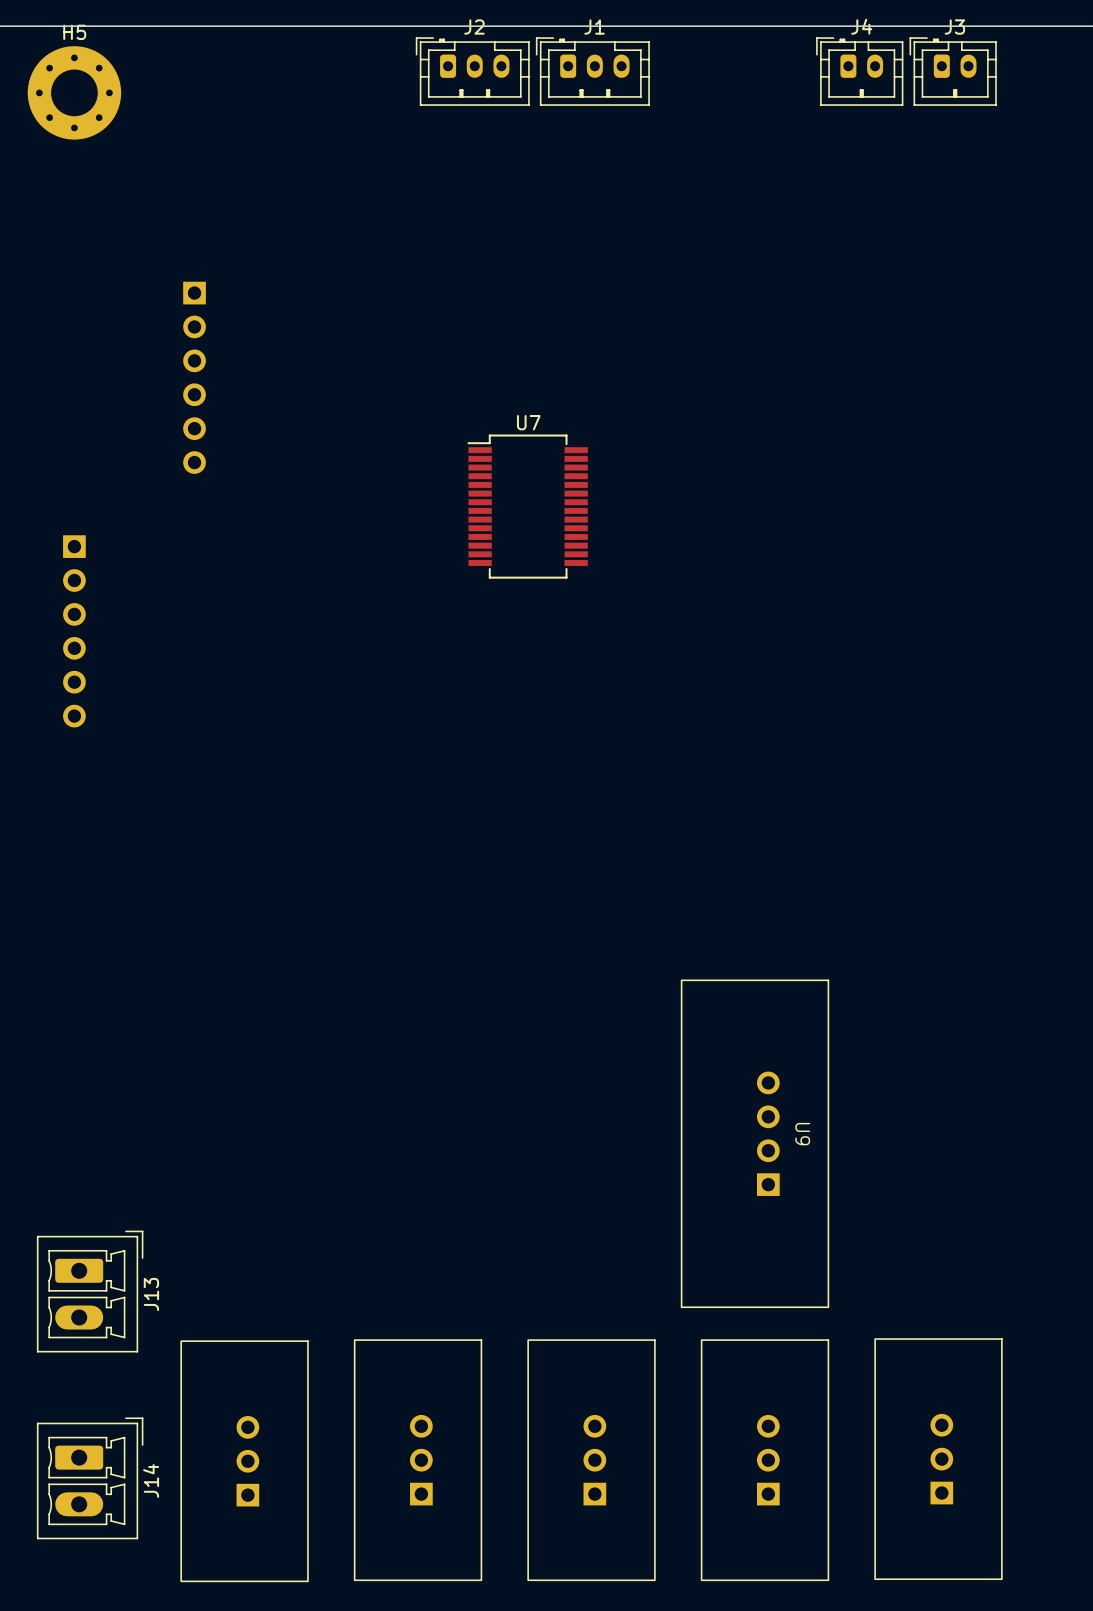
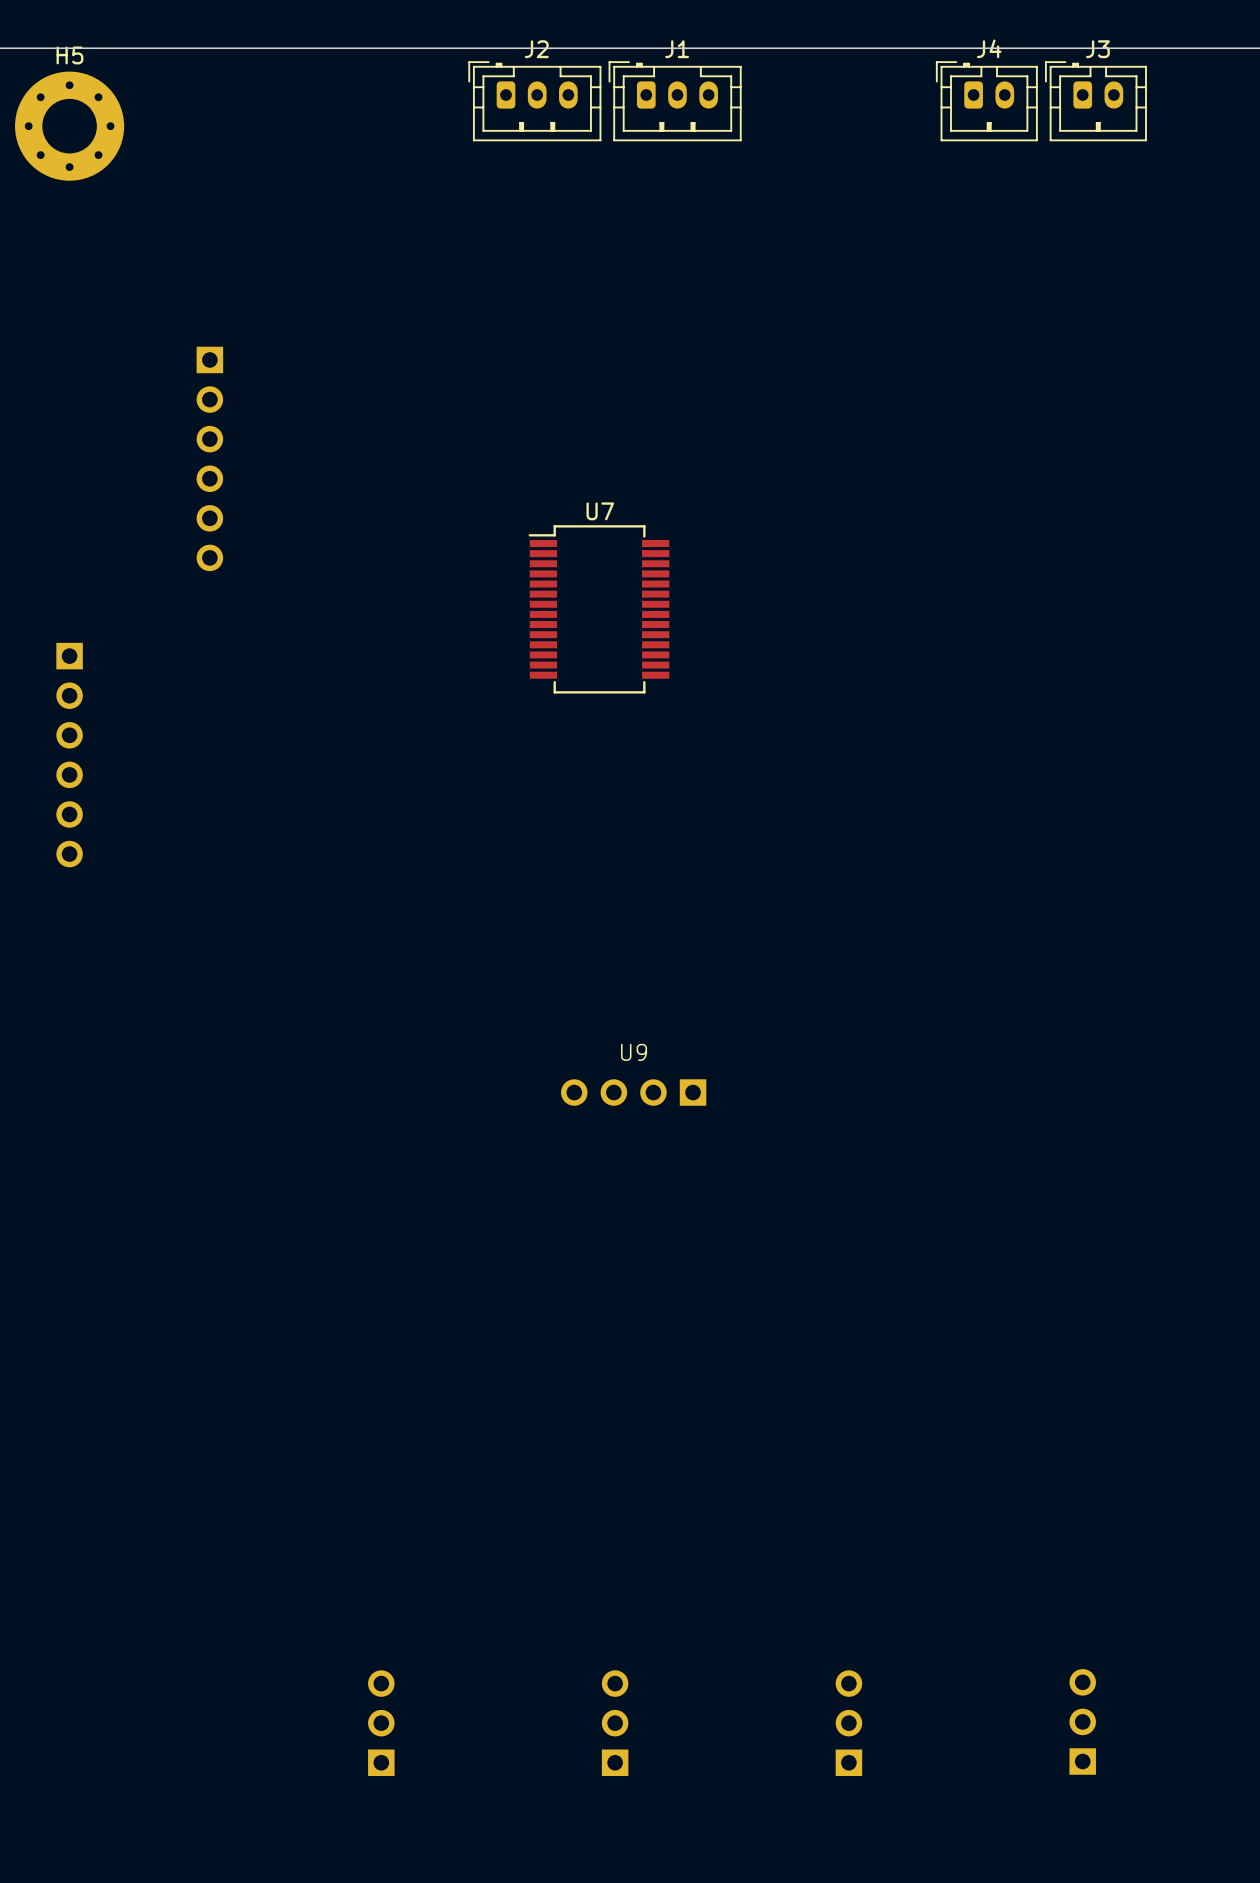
U9 footprint: [680, 979, 830, 1308] -> [561, 1079, 707, 1106]
U9 name position: U9 (802, 1134) -> U9 (634, 1052)
J13: (90, 1291) -> none
part footprint: [874, 1338, 1003, 1580] -> [1069, 1669, 1096, 1775]
part: none -> (381, 1723)
part: (418, 1460) -> none
part: none -> (615, 1723)
part: (591, 1460) -> none
part: none -> (848, 1723)
part: (765, 1460) -> none
part: (244, 1461) -> none
J14: (90, 1478) -> none

